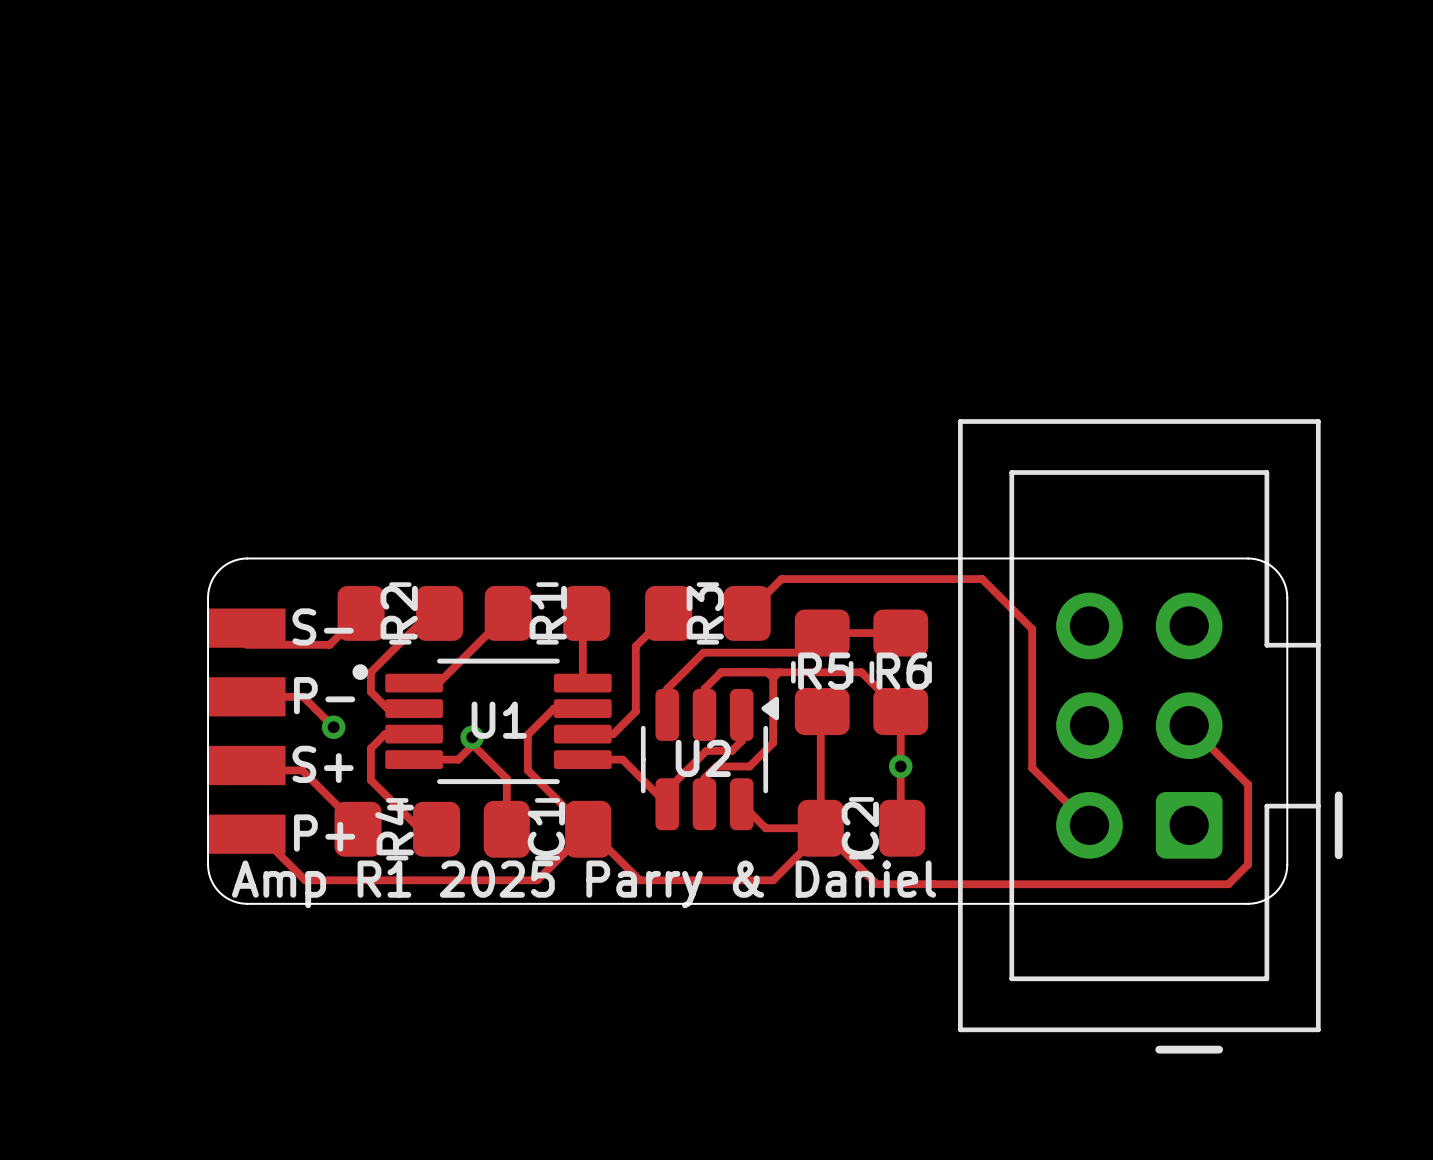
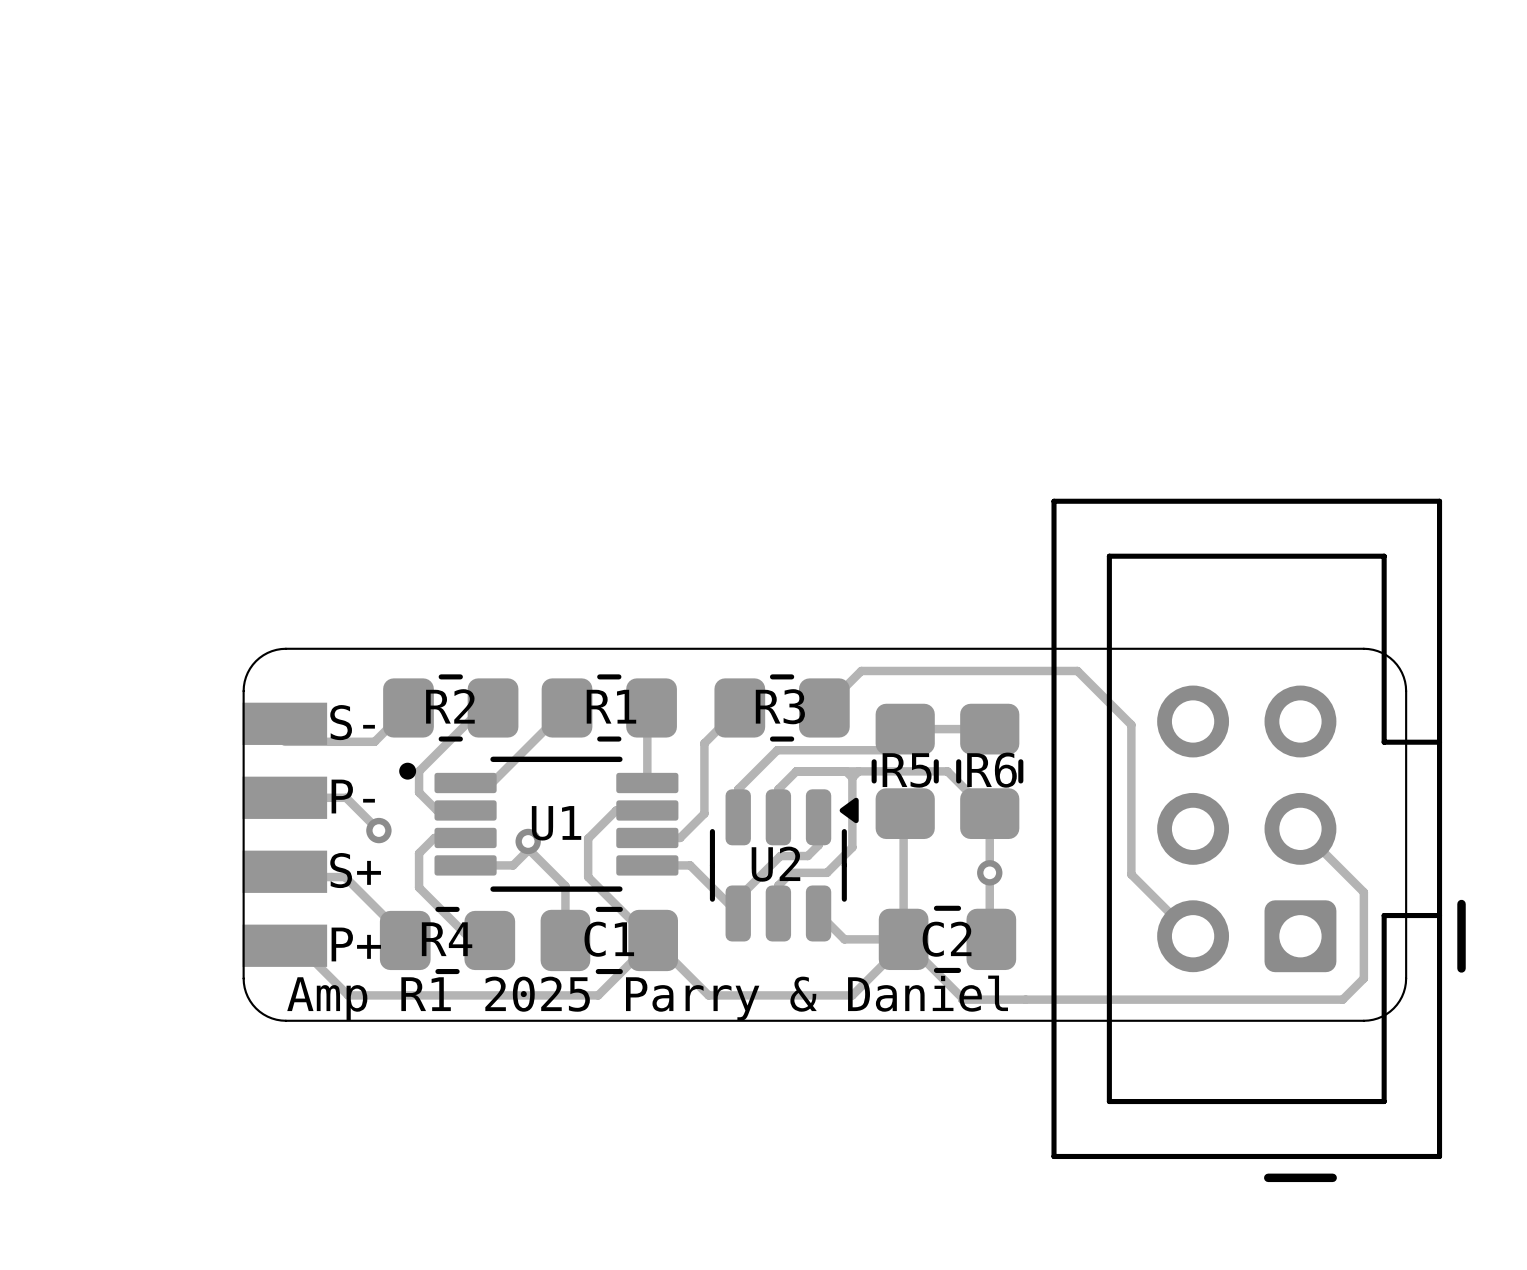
R2 name rotation: 0° (399, 612) -> 90° clockwise (450, 706)
R1 name rotation: 0° (548, 612) -> 90° clockwise (611, 706)
R3 name rotation: 0° (705, 612) -> 90° clockwise (780, 706)
R4 name rotation: 0° (394, 827) -> 90° clockwise (447, 939)
C1 name rotation: 0° (546, 829) -> 90° clockwise (609, 939)
C2 name rotation: 0° (860, 829) -> 90° clockwise (947, 939)

